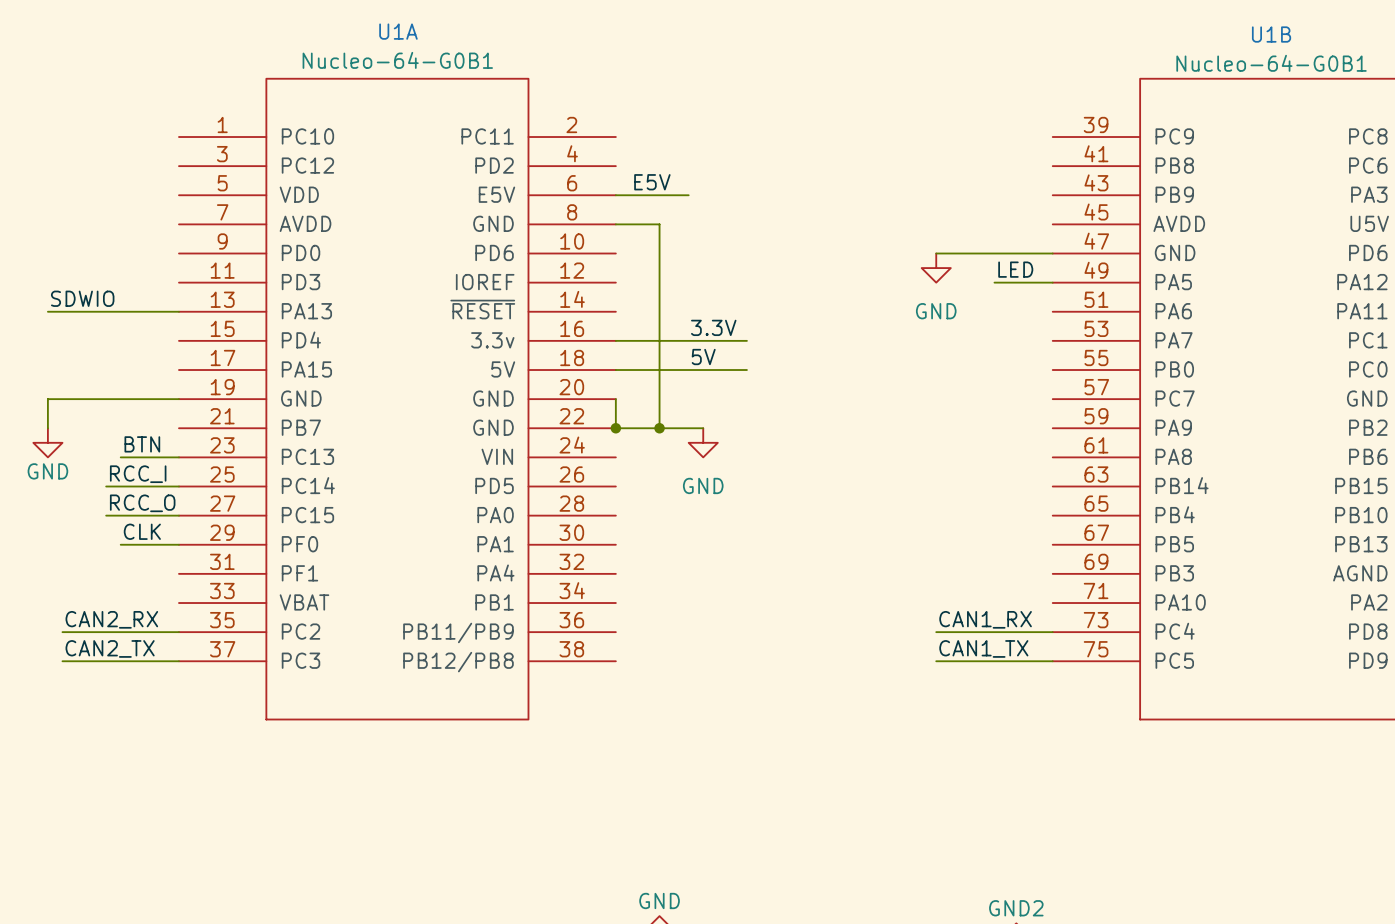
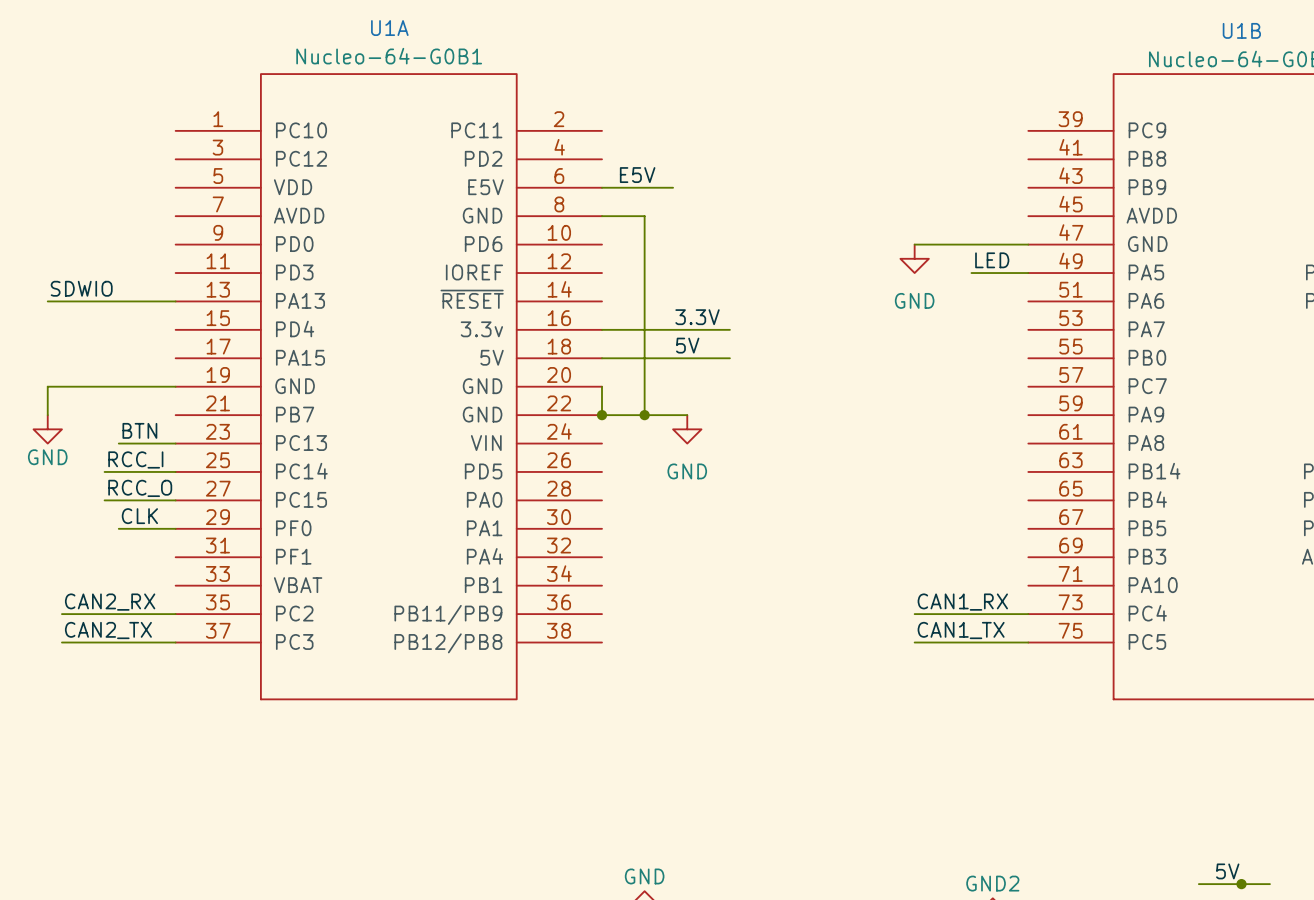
label: none -> 5V (1227, 871)
wire: none -> (1198, 884) (1269, 884)
junction: none -> (1241, 884)

